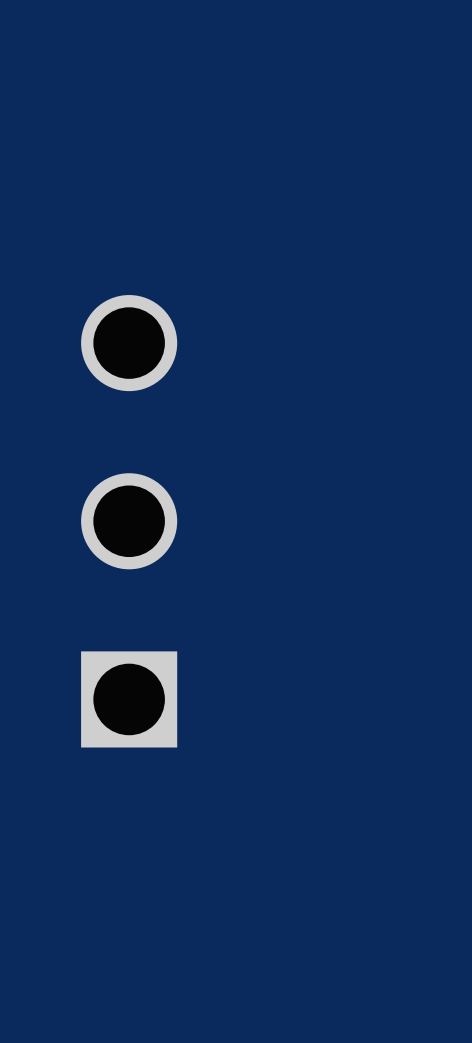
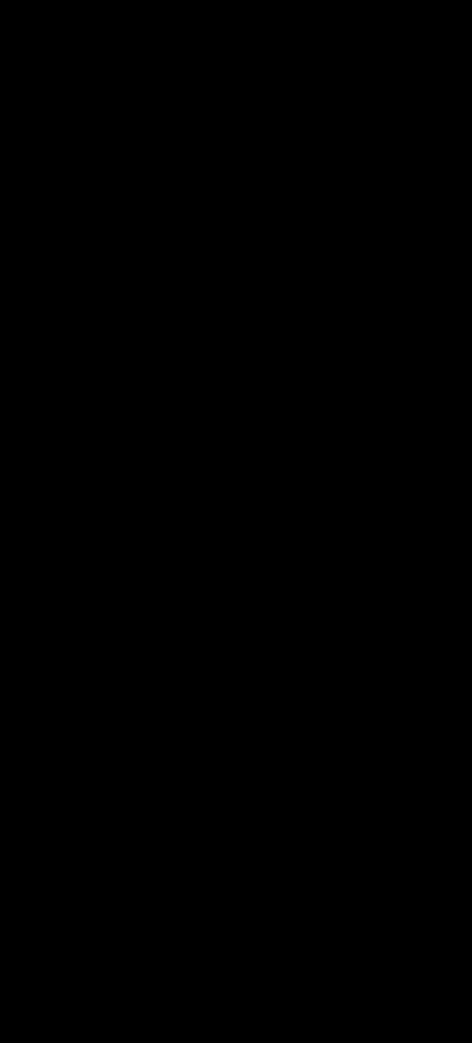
part: (129, 521) -> none

